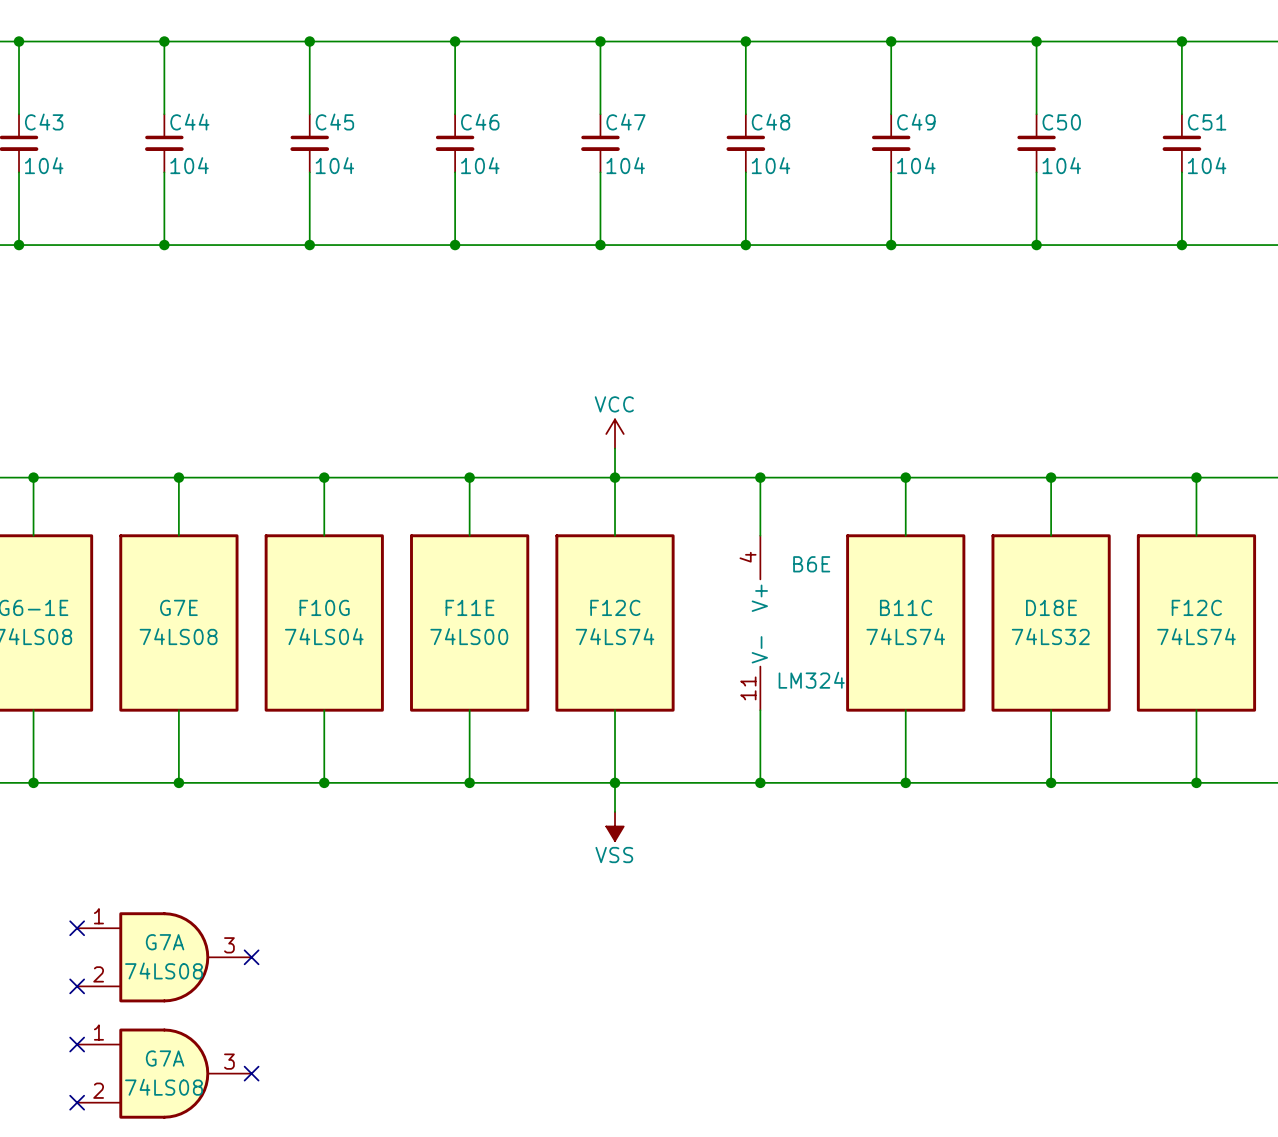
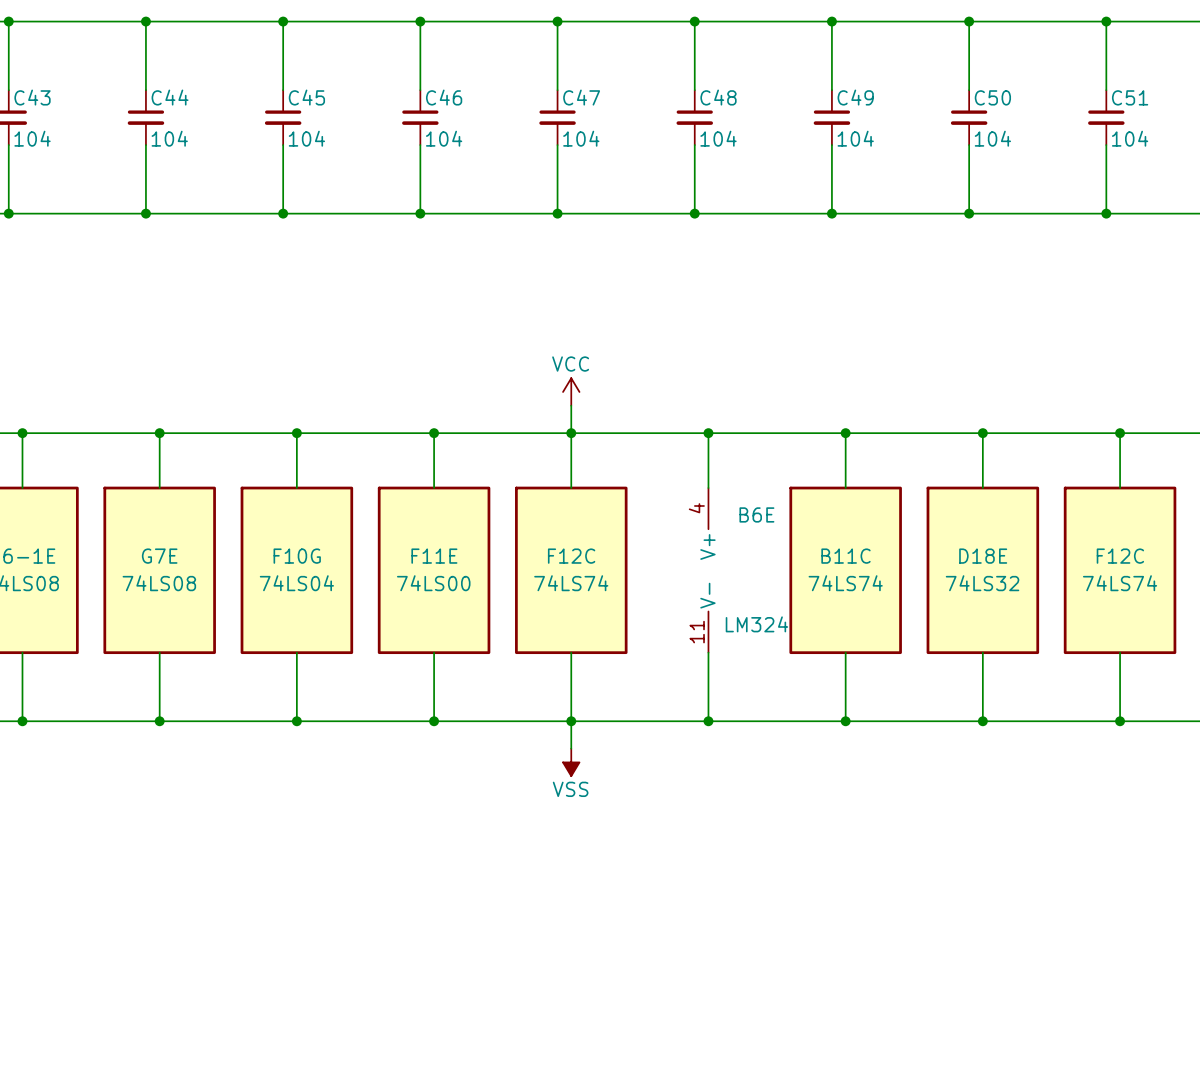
no-connect mark: (77, 928) -> none
G7A: 74LS08 (164, 957) -> none
no-connect mark: (251, 957) -> none
no-connect mark: (77, 986) -> none
no-connect mark: (77, 1044) -> none
G7A: 74LS08 (164, 1073) -> none
no-connect mark: (251, 1073) -> none
no-connect mark: (77, 1102) -> none

